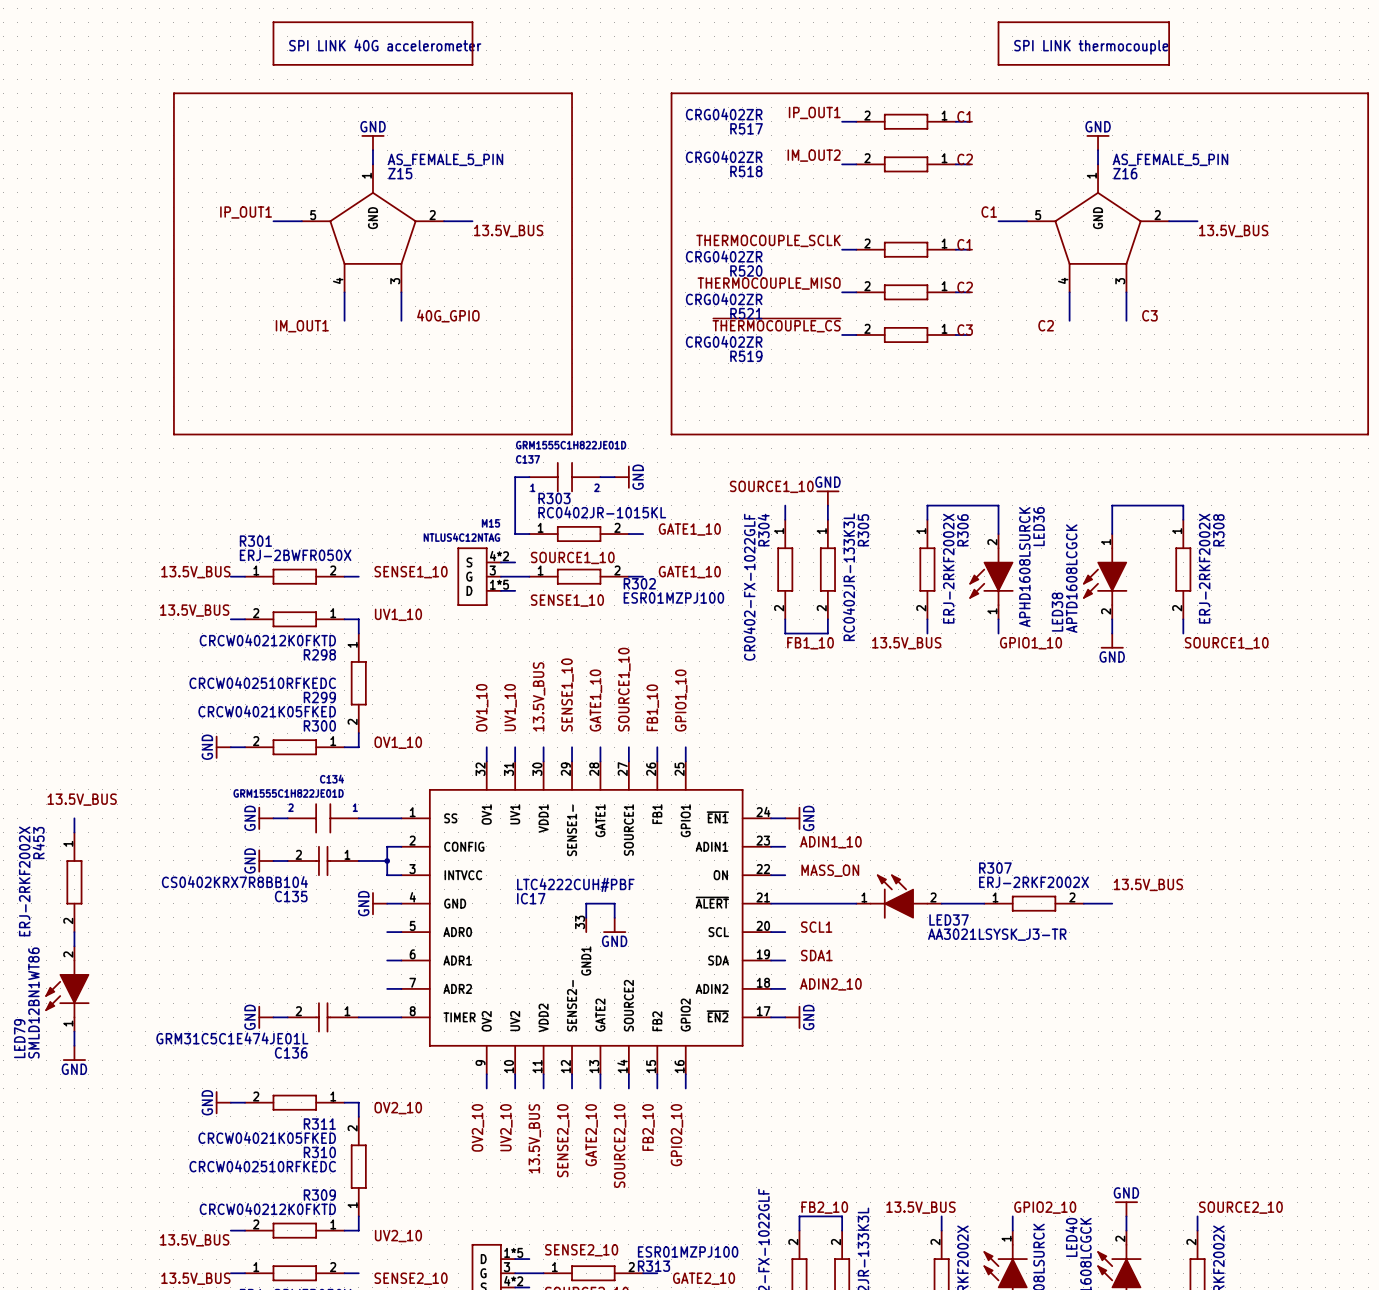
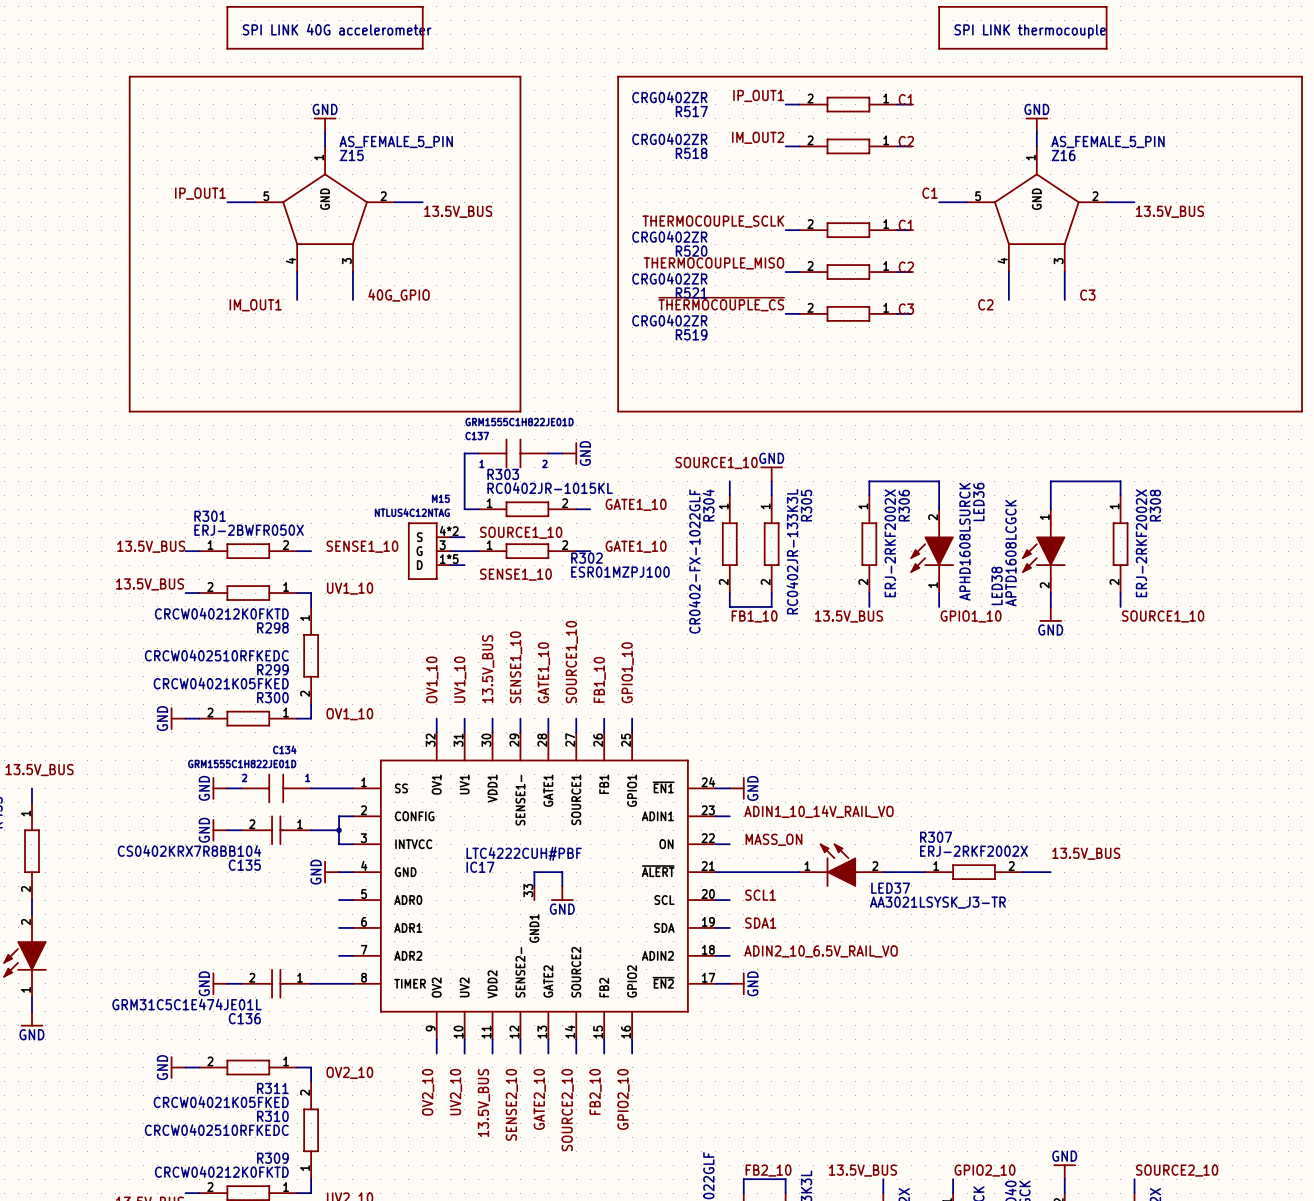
label: ADIN1_10 (830, 842) -> ADIN1_10_14V_RAIL_VO (818, 811)
label: ADIN2_10 (830, 984) -> ADIN2_10_6.5V_RAIL_VO (821, 951)

